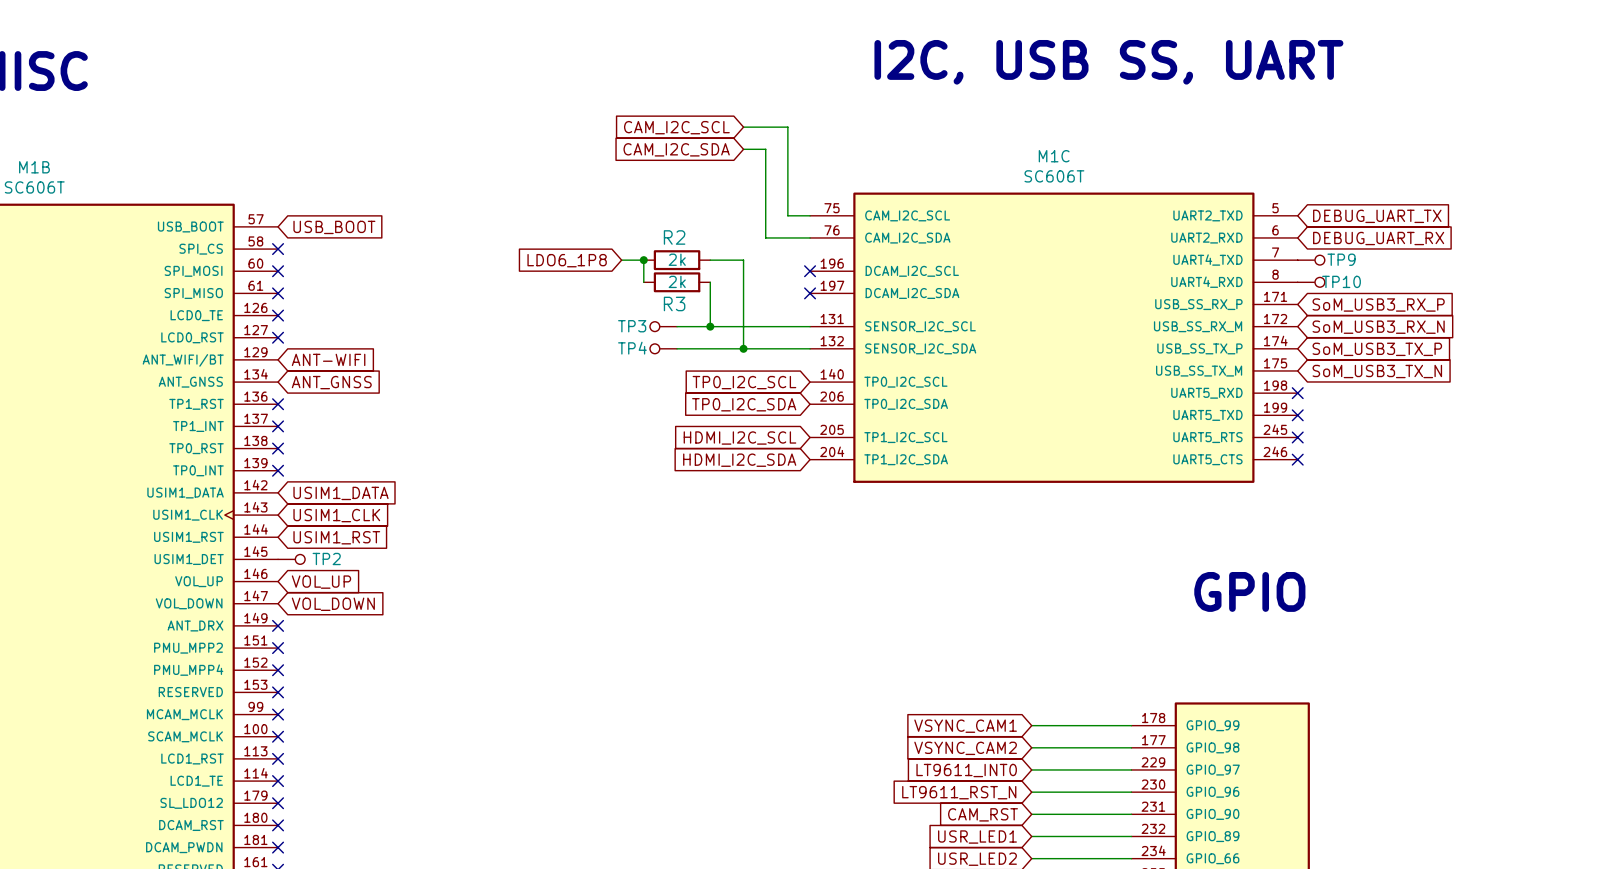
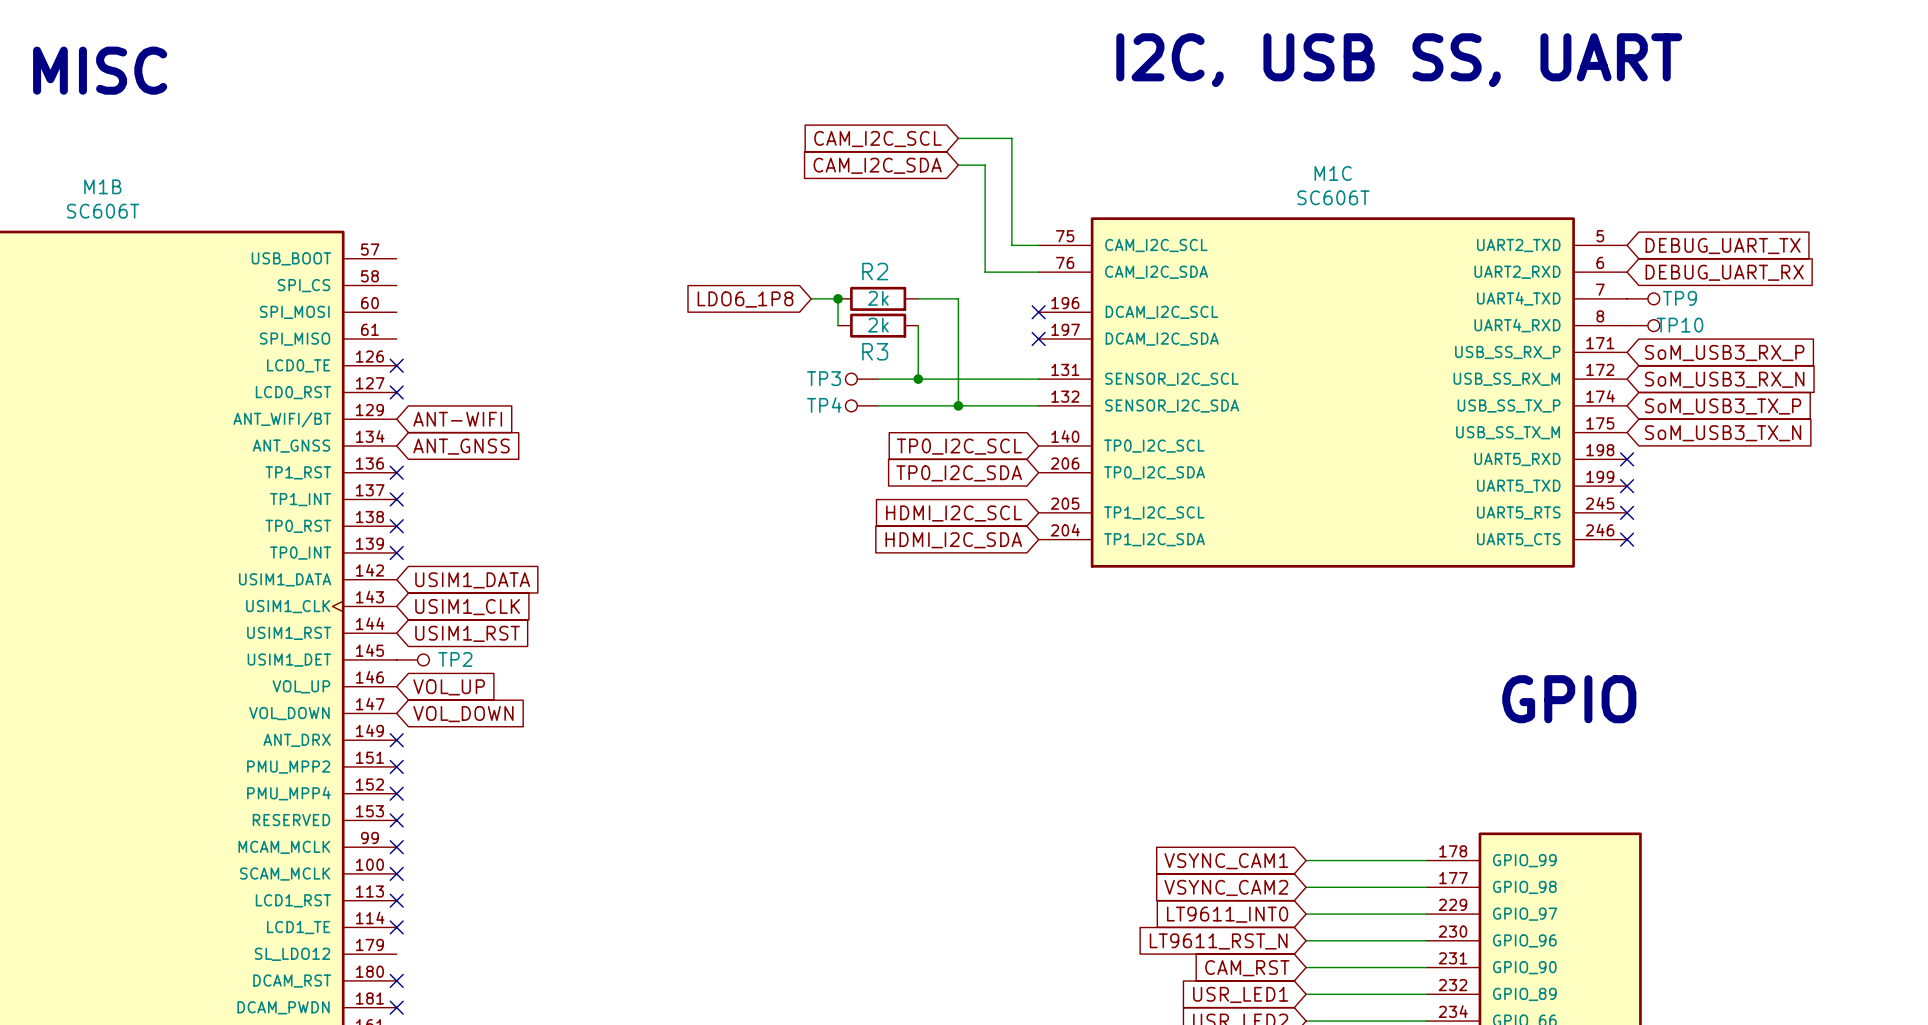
global label: USB_BOOT (334, 227) -> none
no-connect mark: (278, 249) -> none
no-connect mark: (278, 271) -> none
no-connect mark: (278, 293) -> none
no-connect mark: (278, 803) -> none

